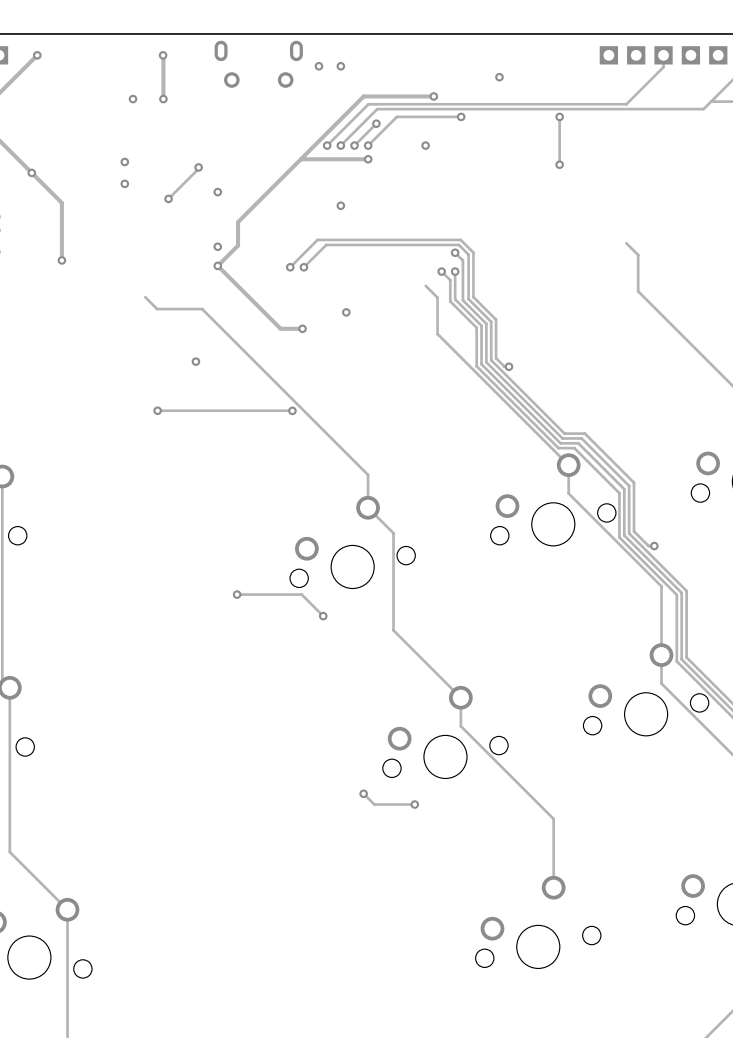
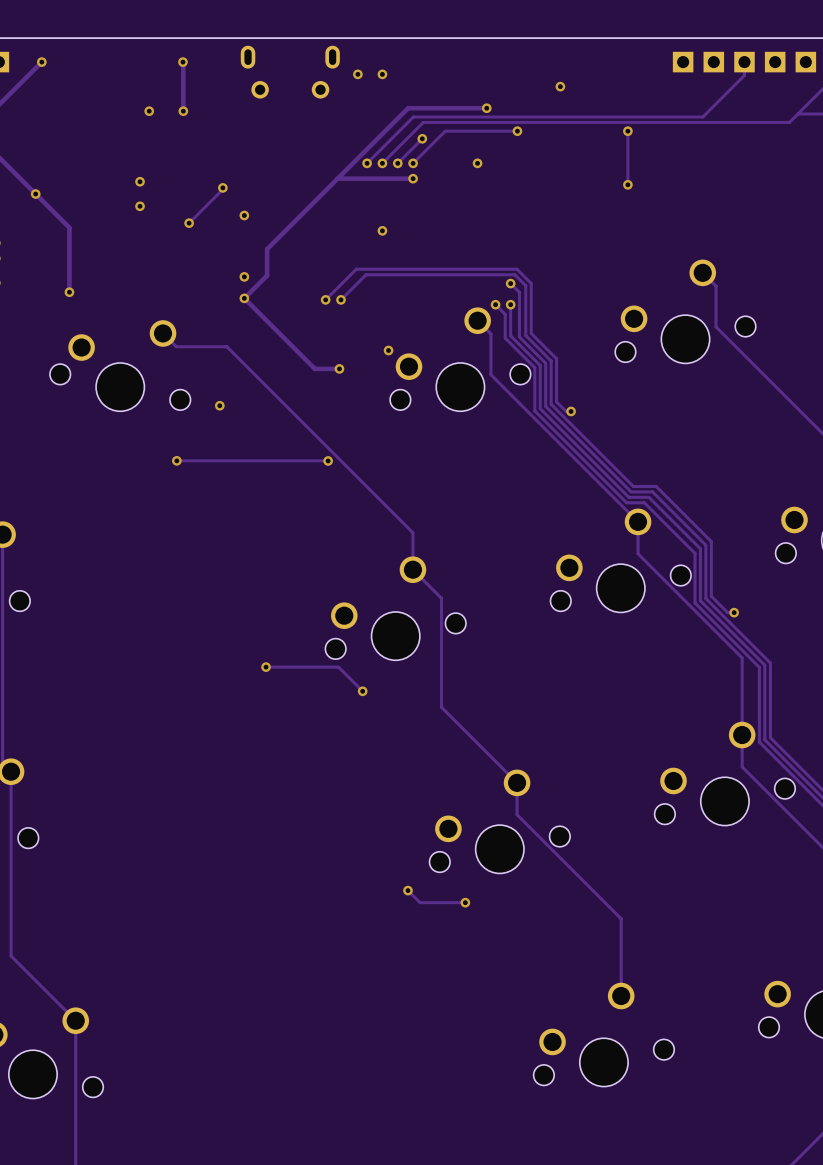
part: none -> (685, 311)
part: none -> (460, 359)
part: none -> (120, 365)

